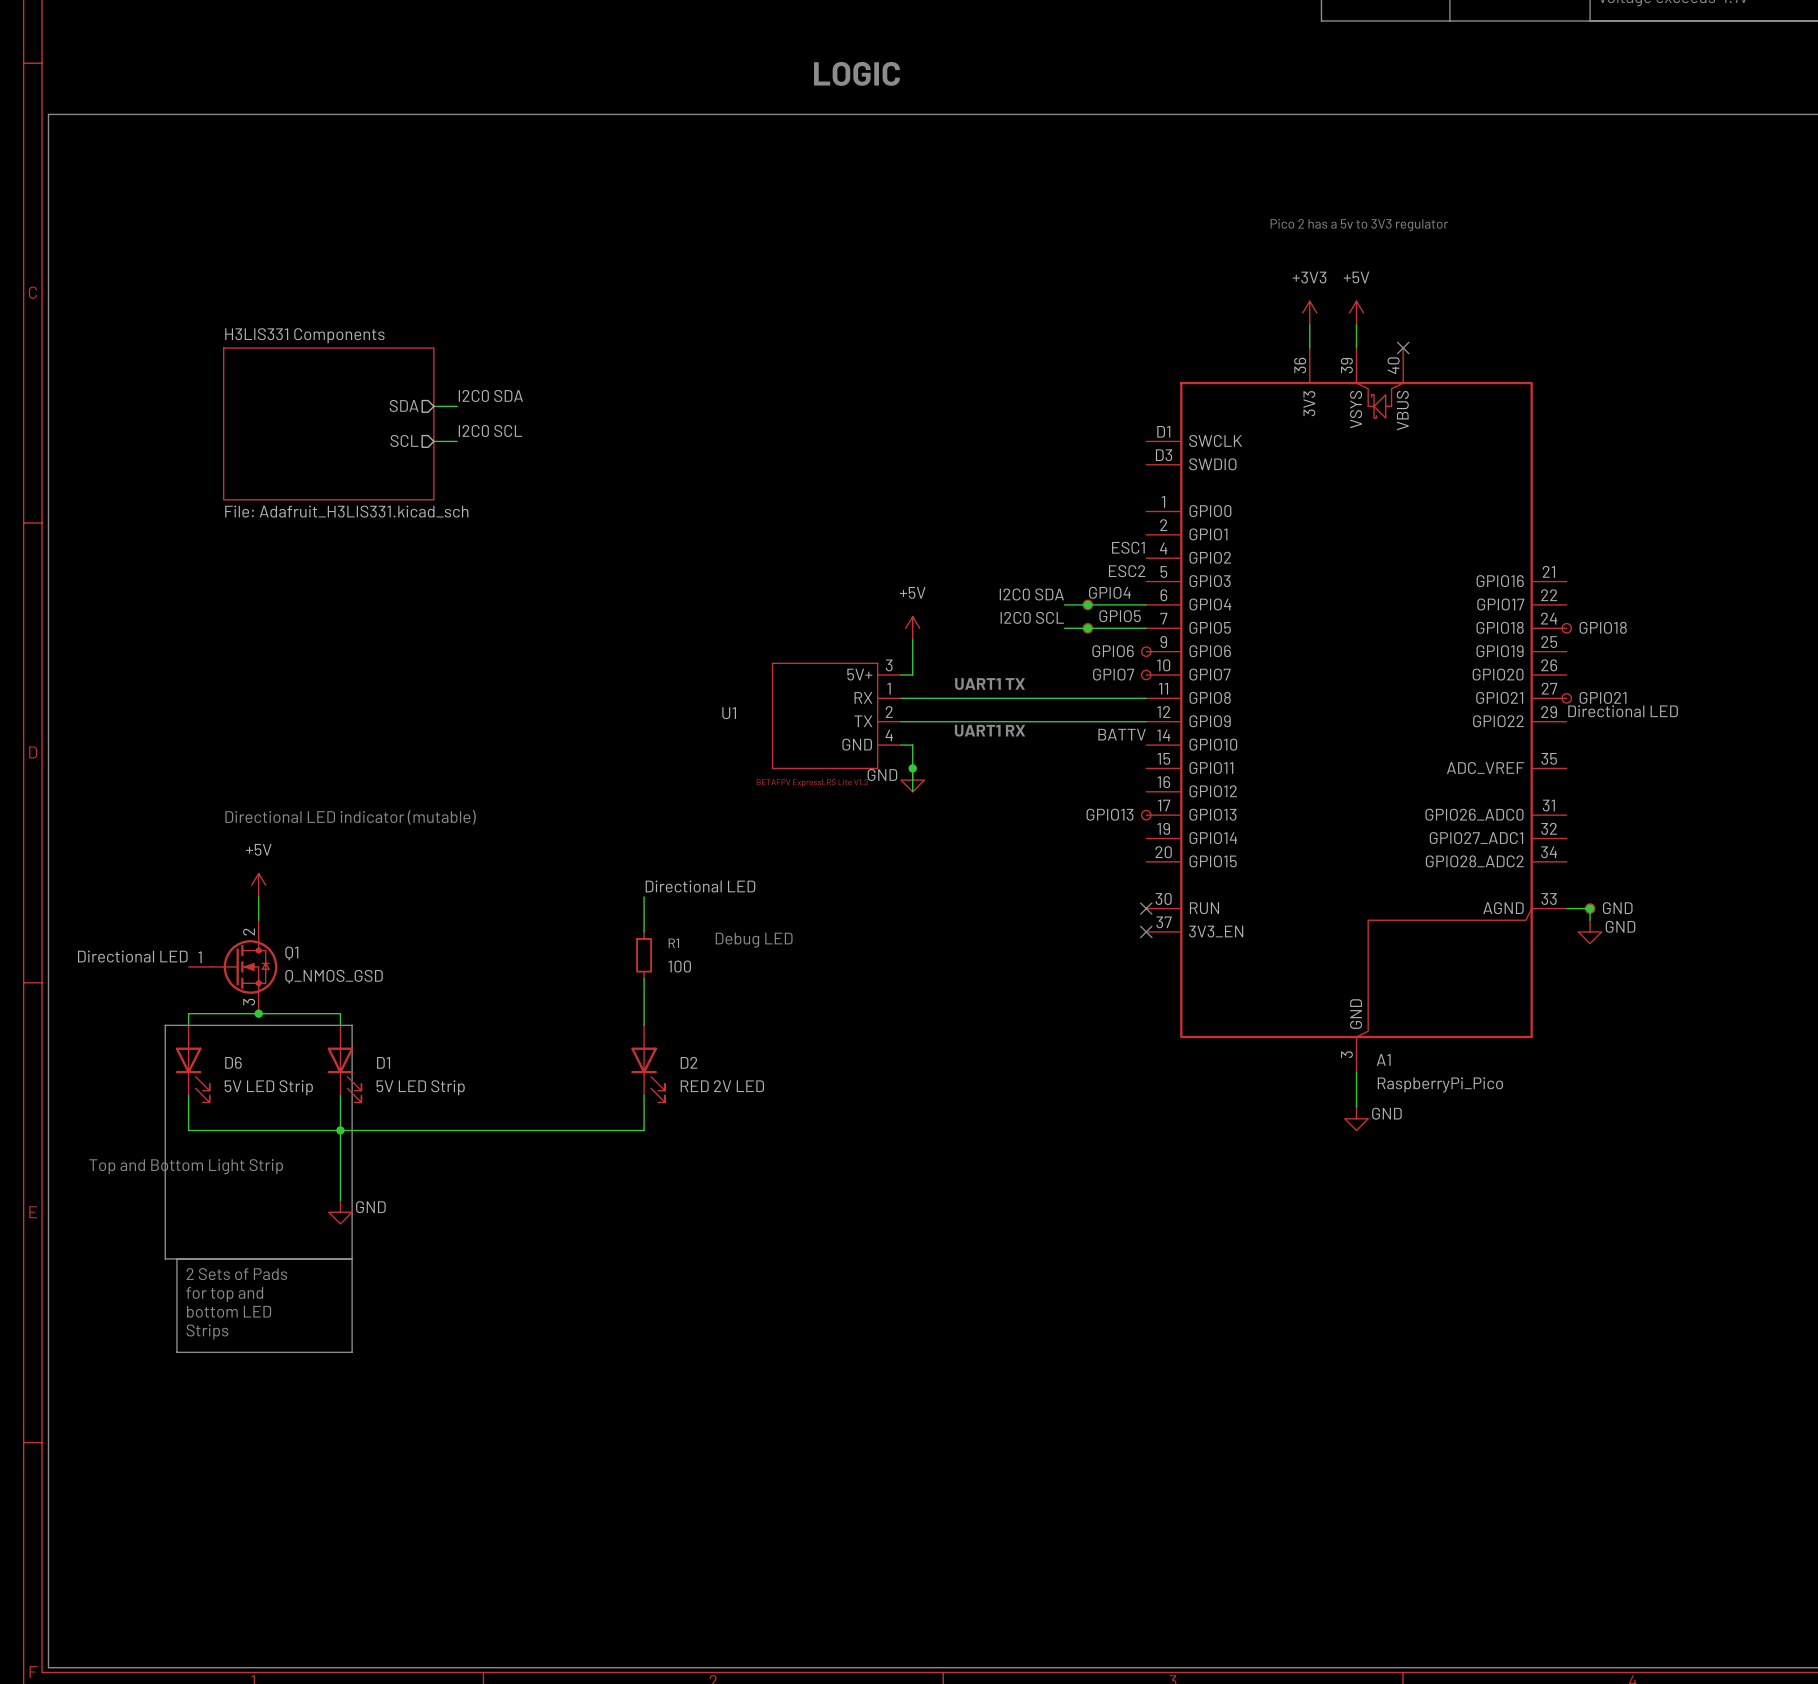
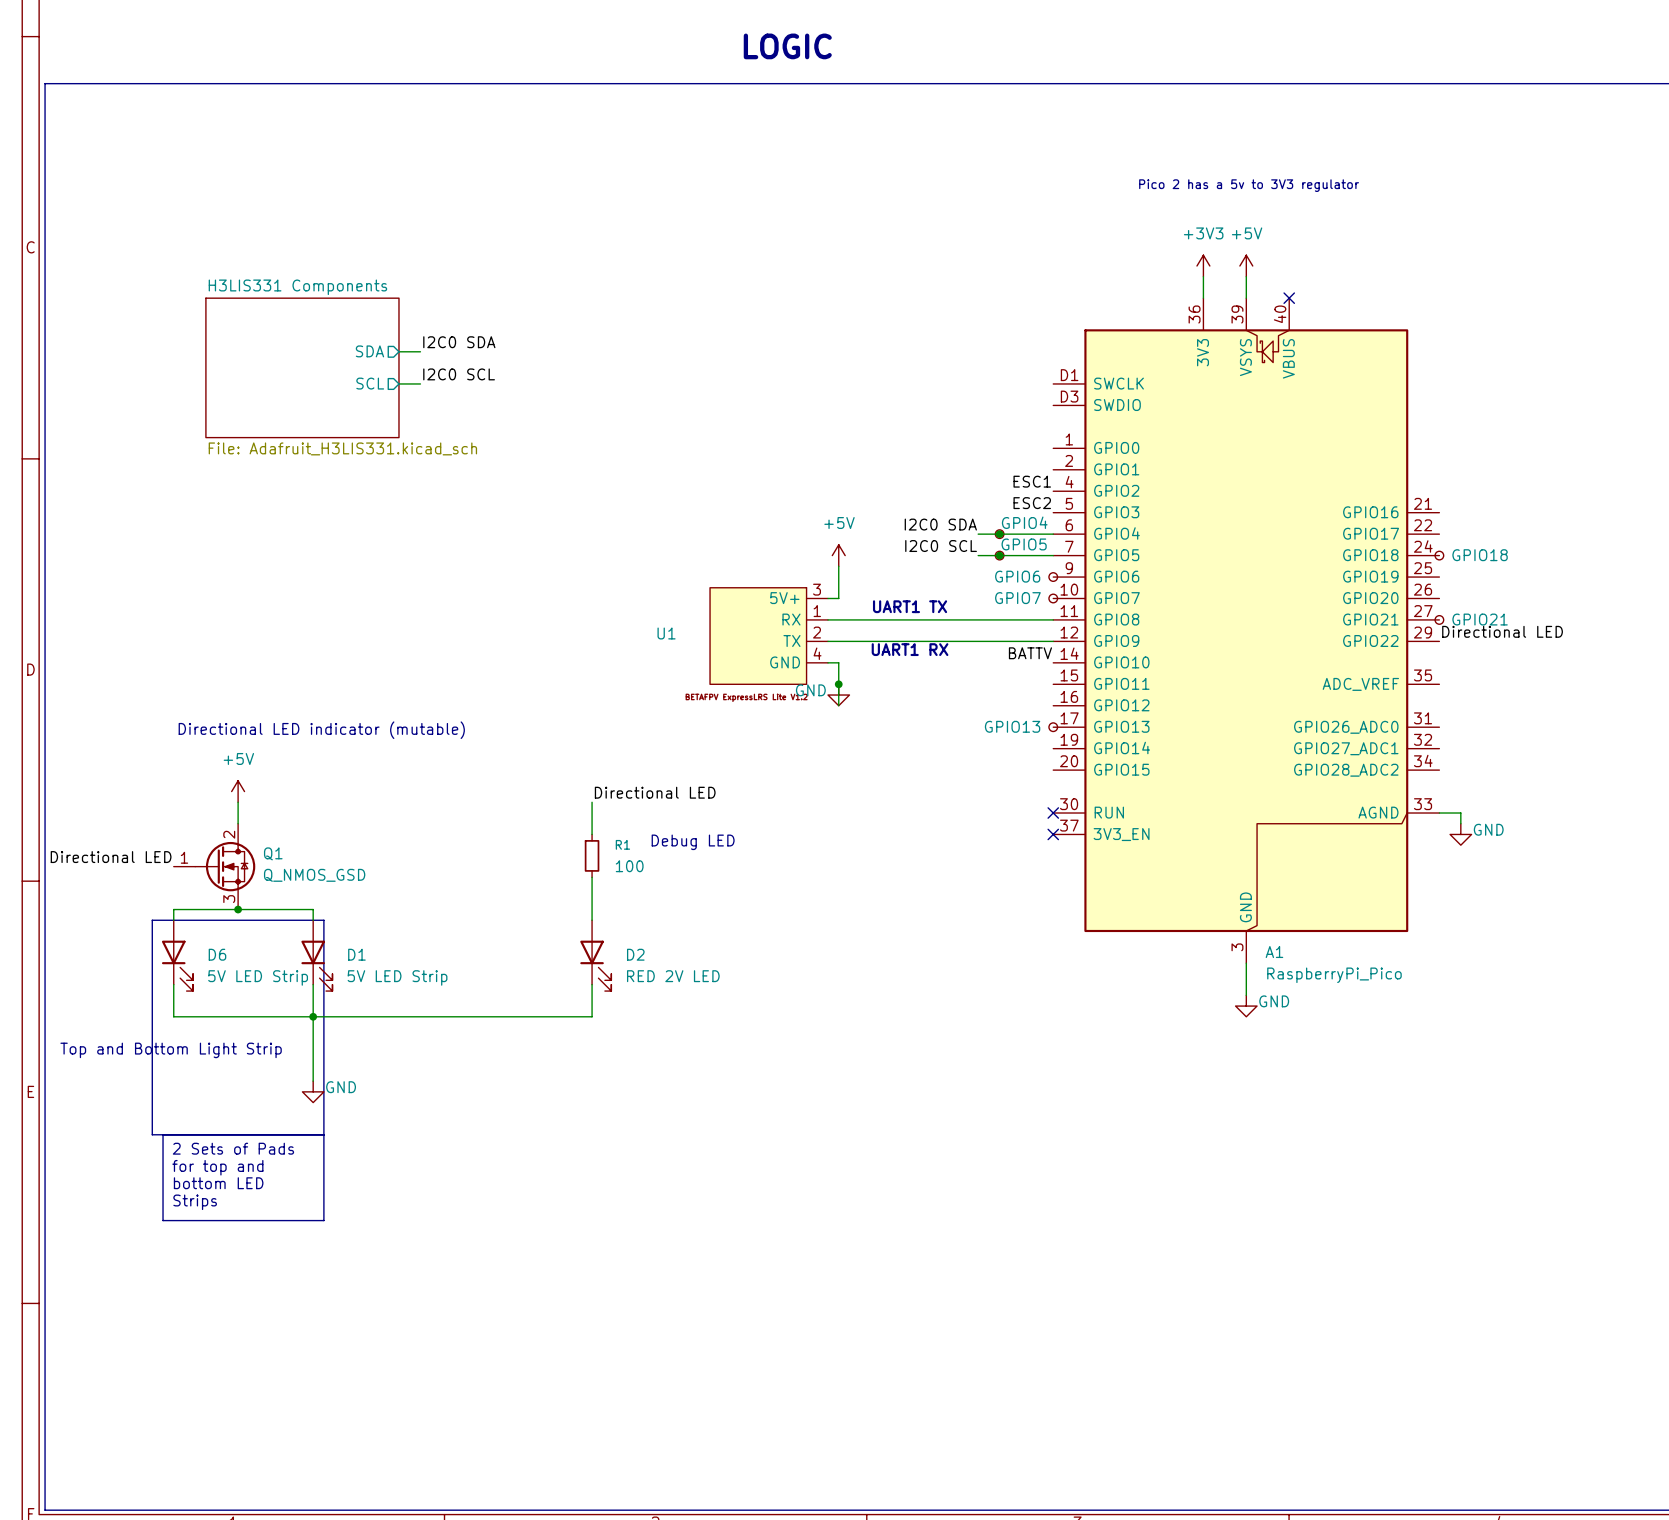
junction: (1590, 908) -> none
part: GND (1590, 908) -> none

